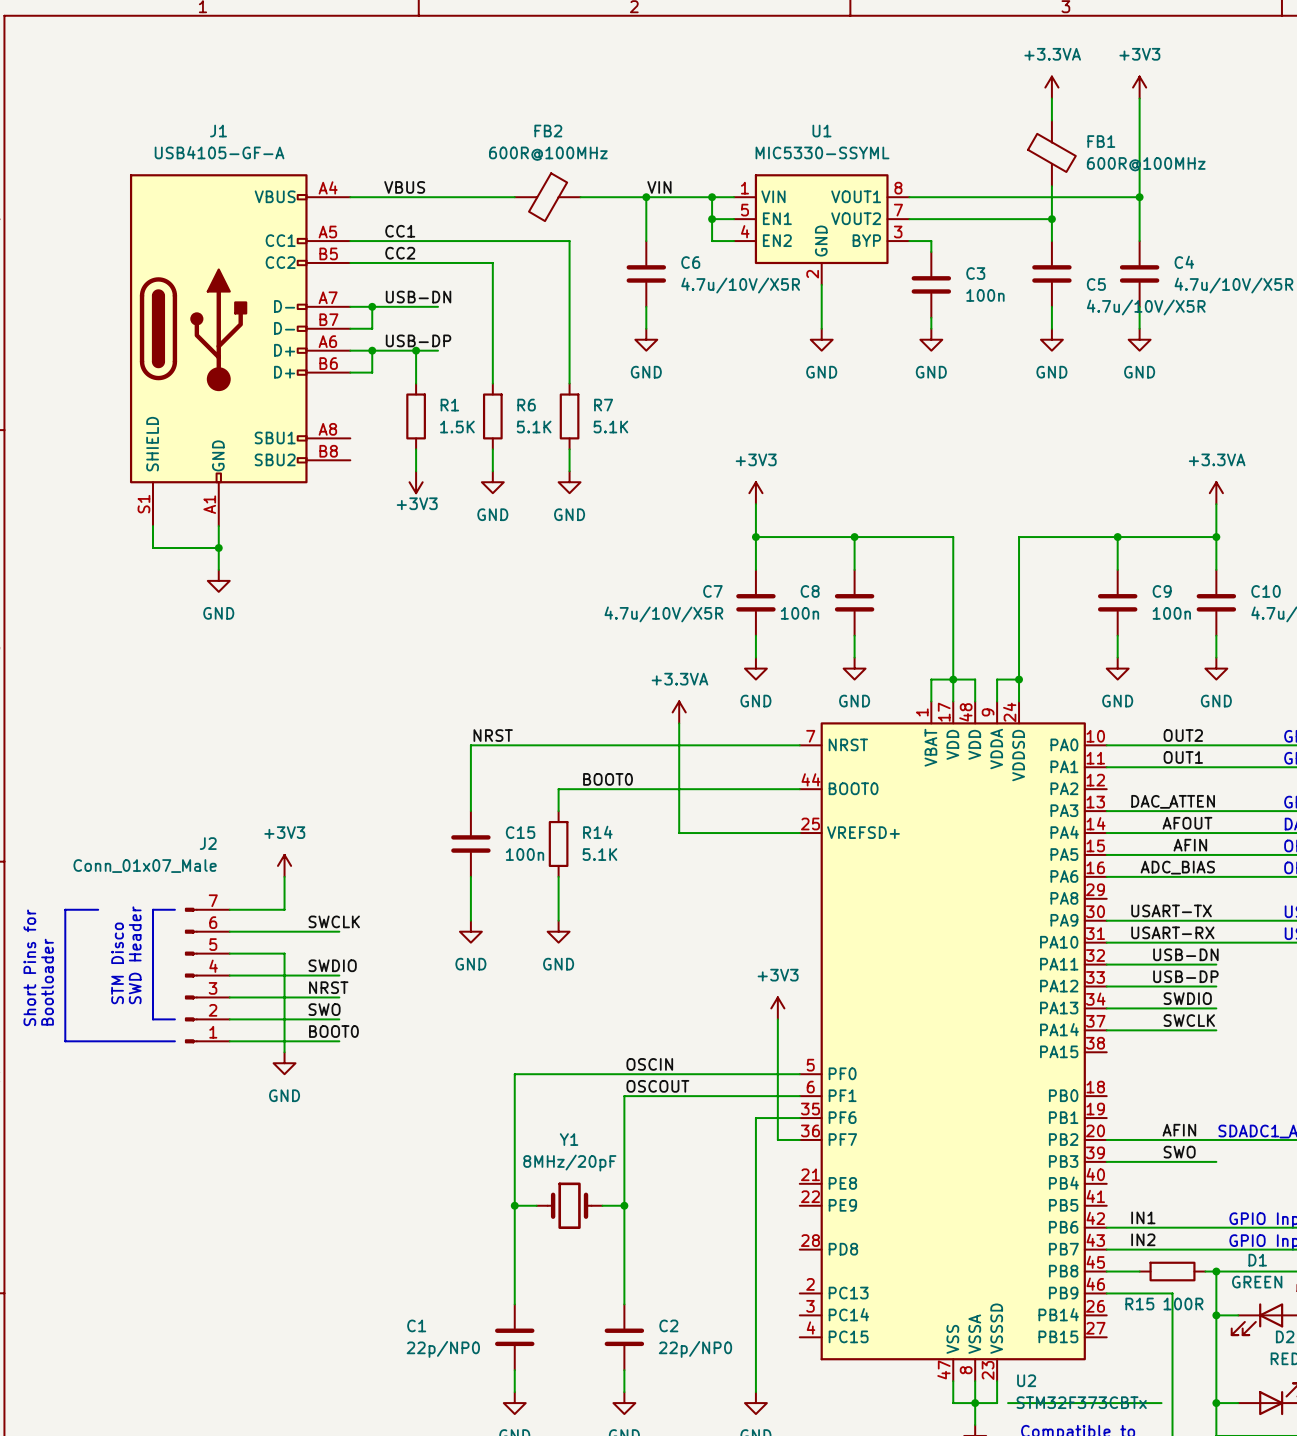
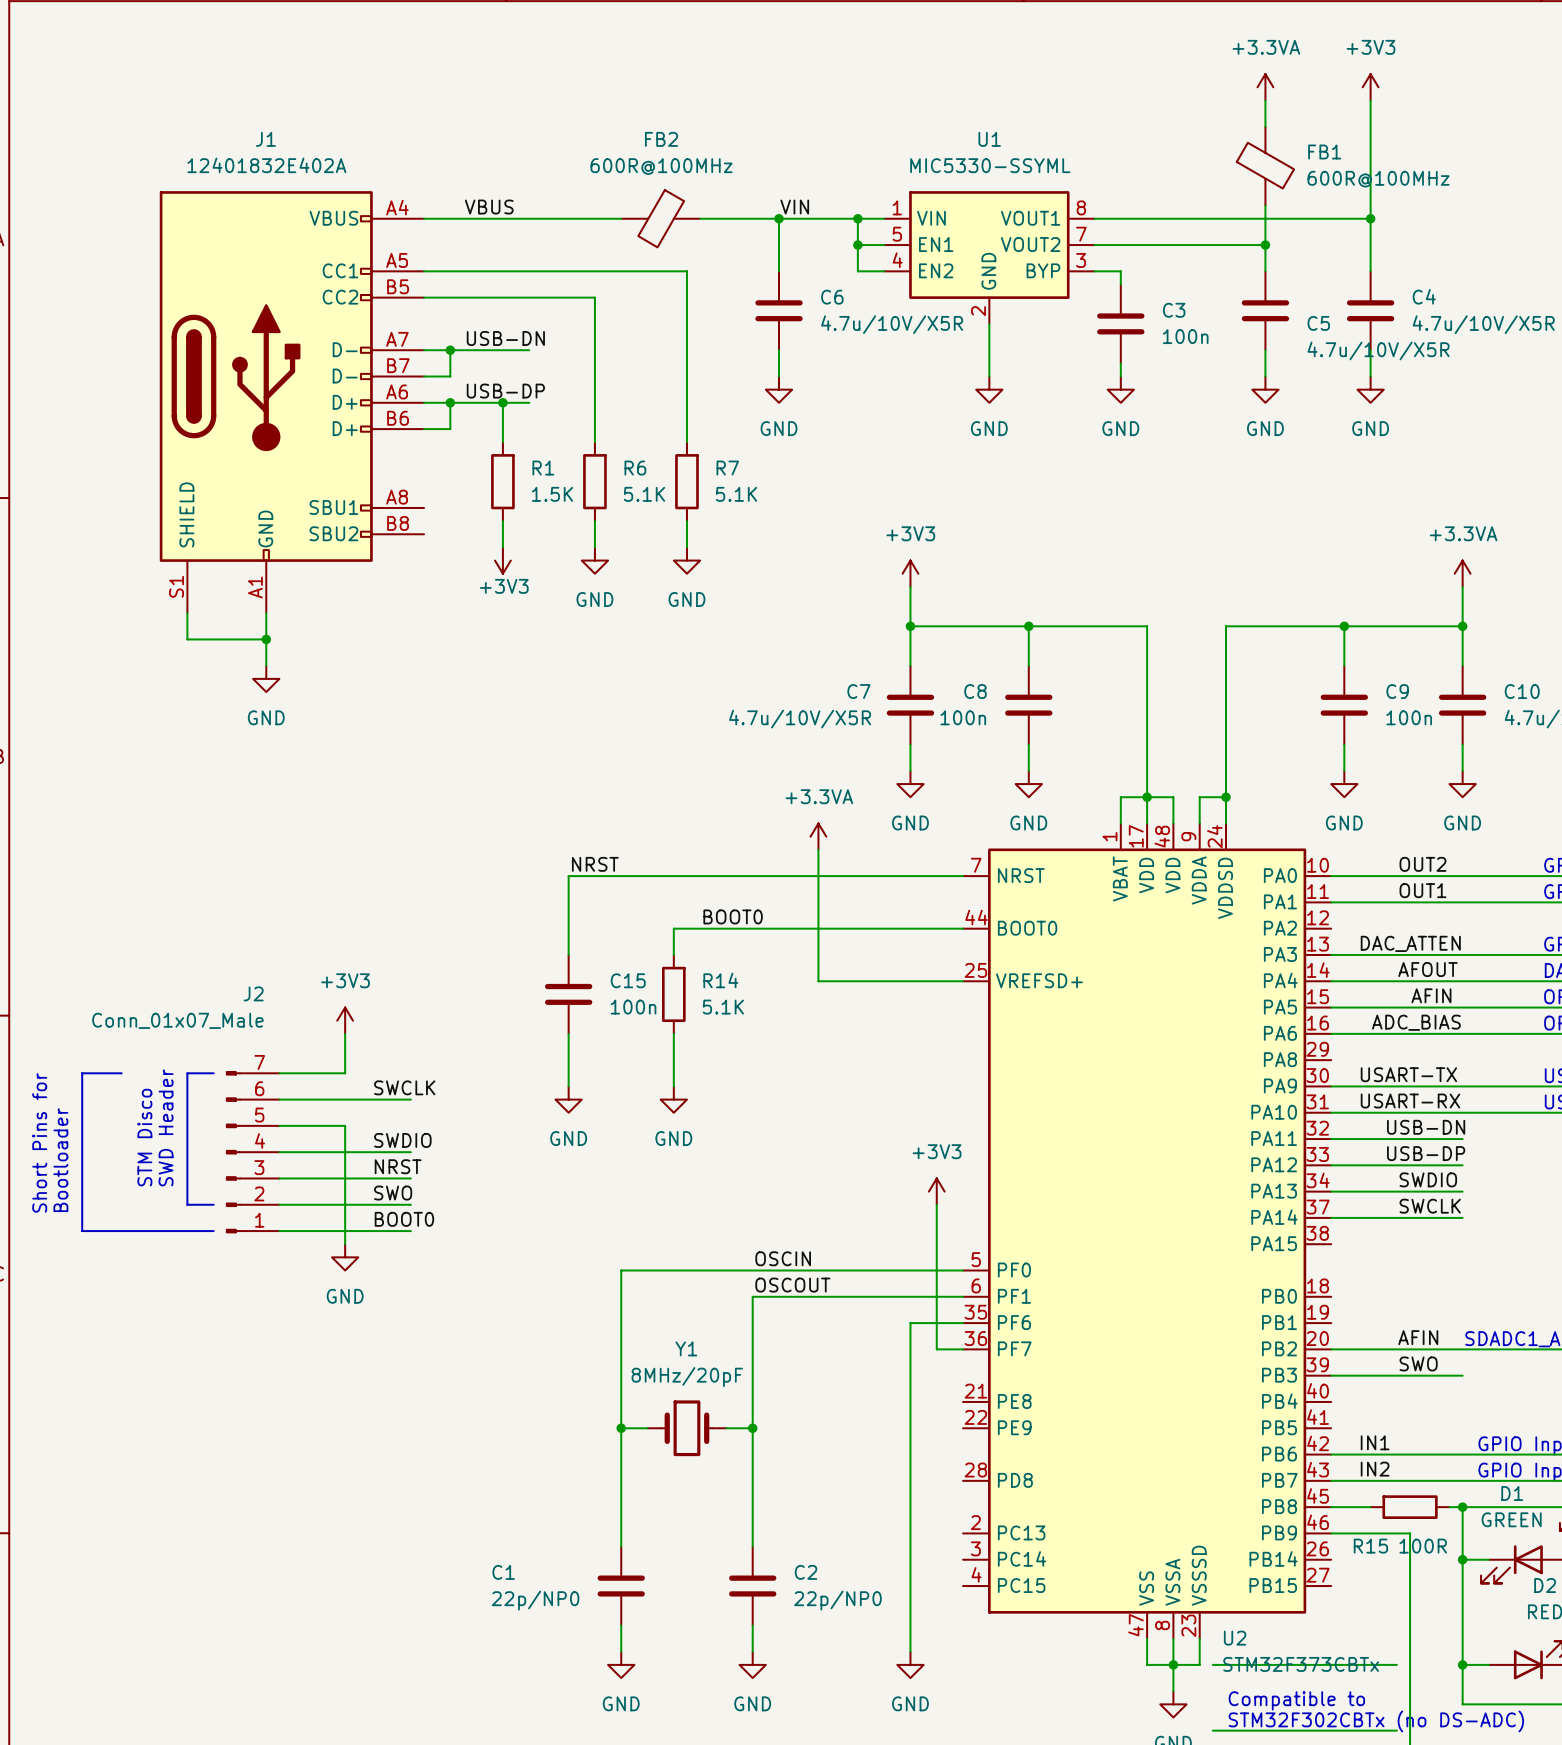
J1 value: USB4105-GF-A (219, 152) -> 12401832E402A (266, 165)
label: CC1 (400, 231) -> none
label: CC2 (400, 253) -> none

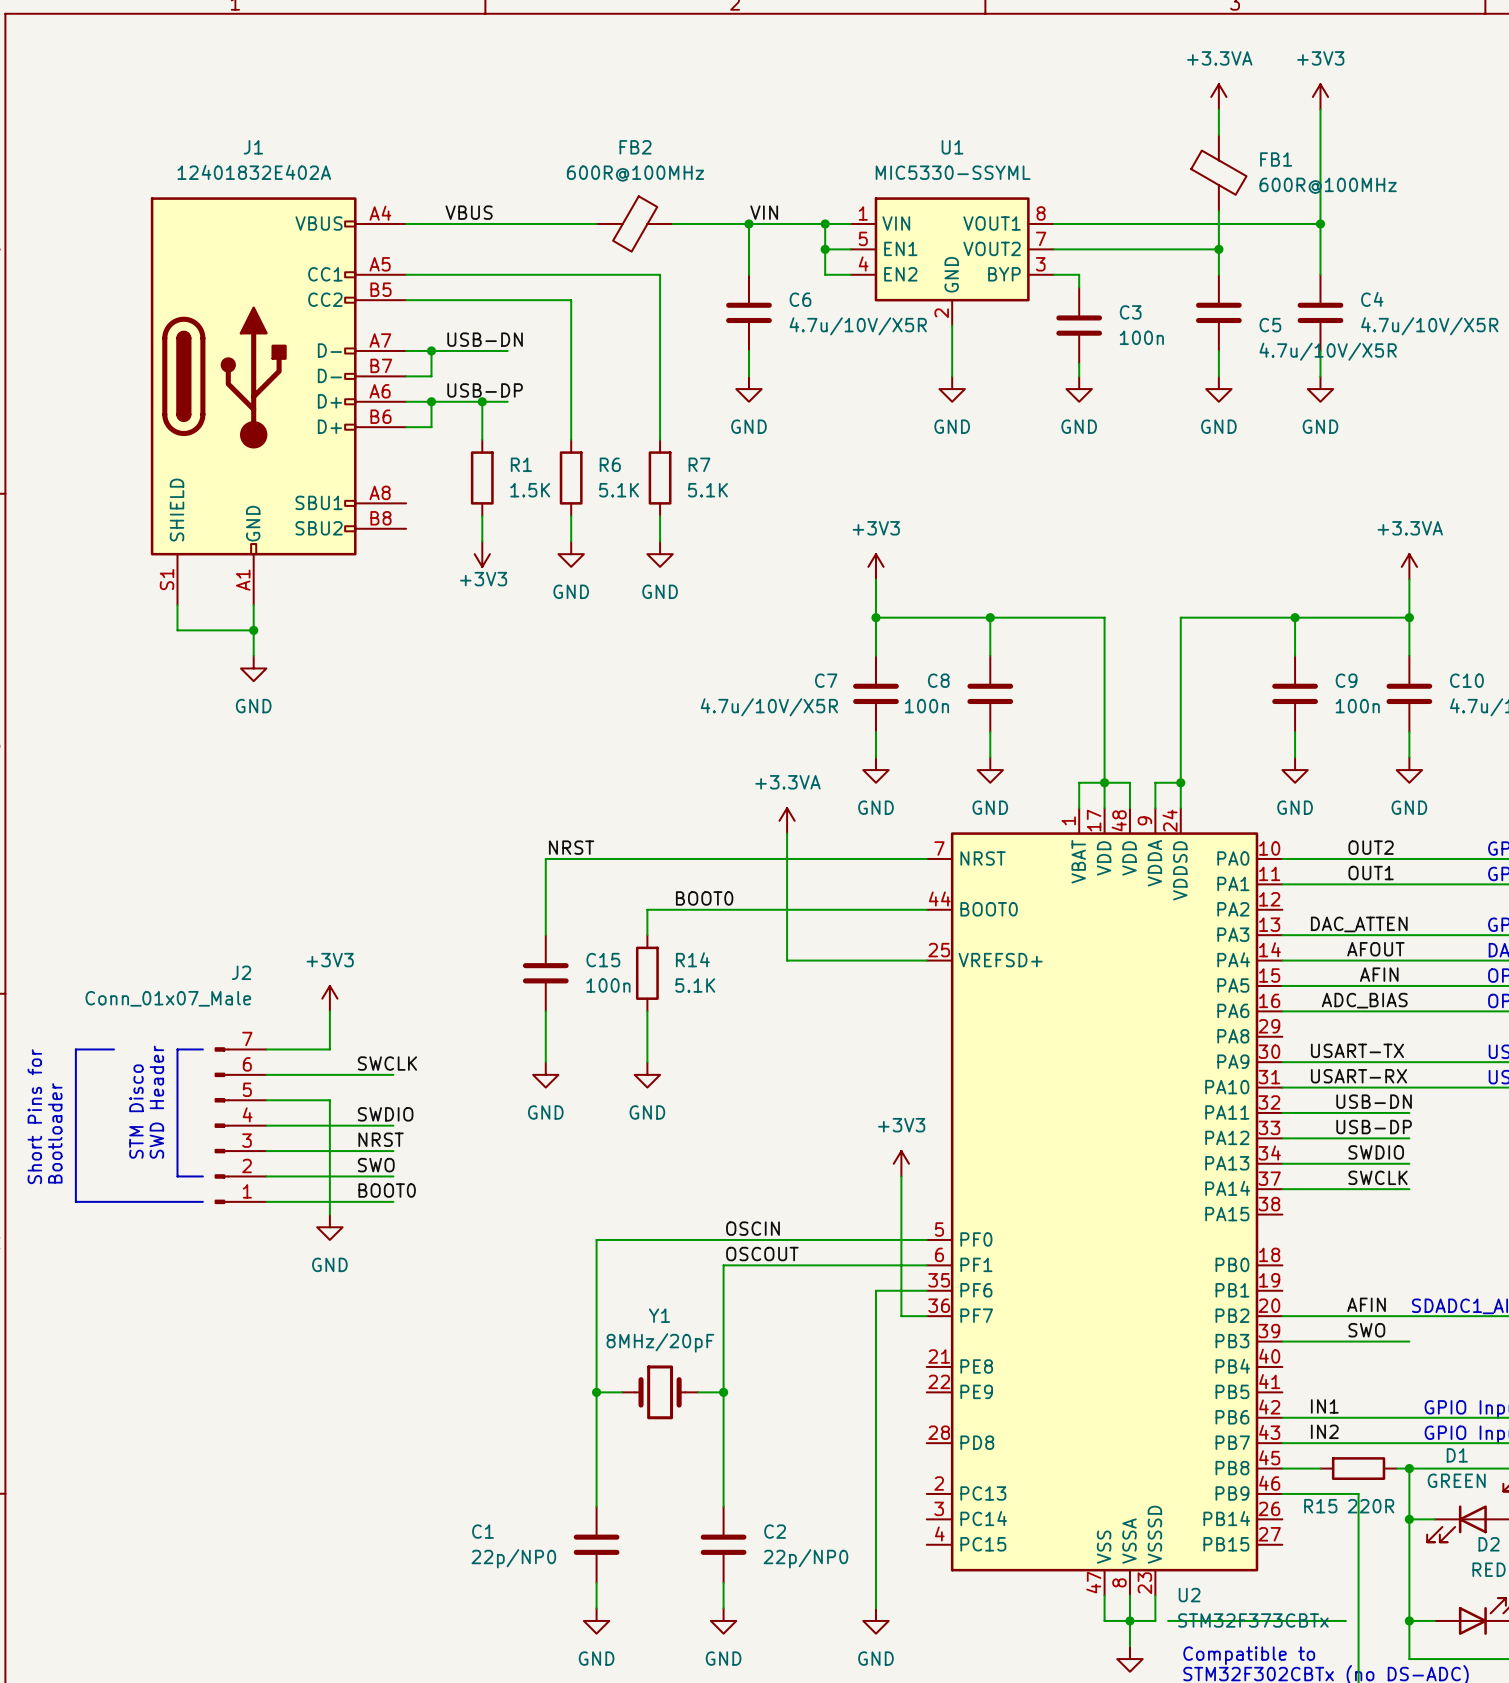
R15 value: 100R (1423, 1546) -> 220R (1370, 1506)

